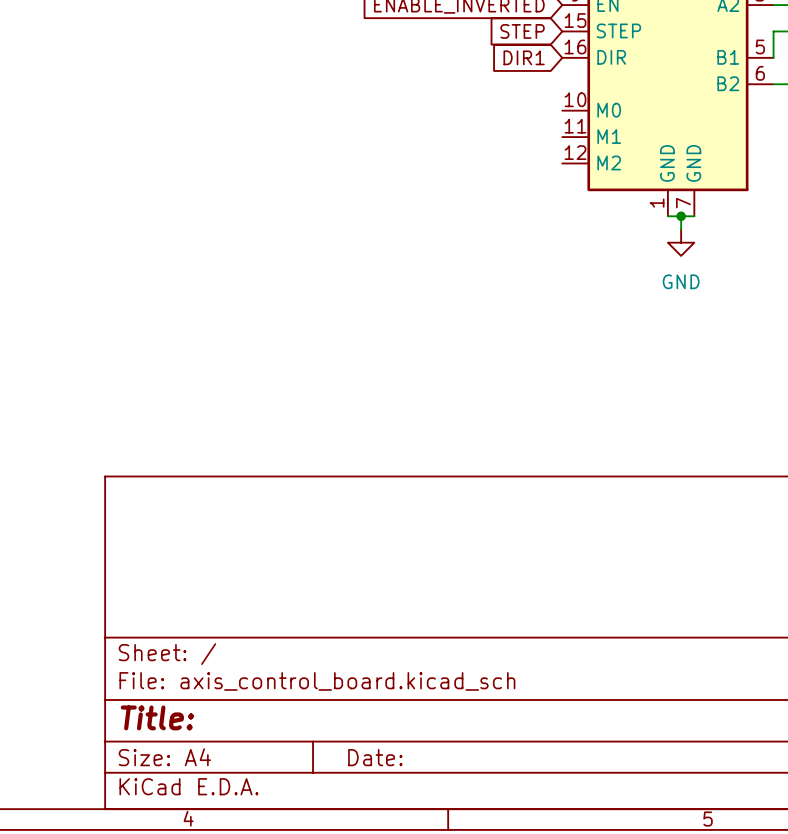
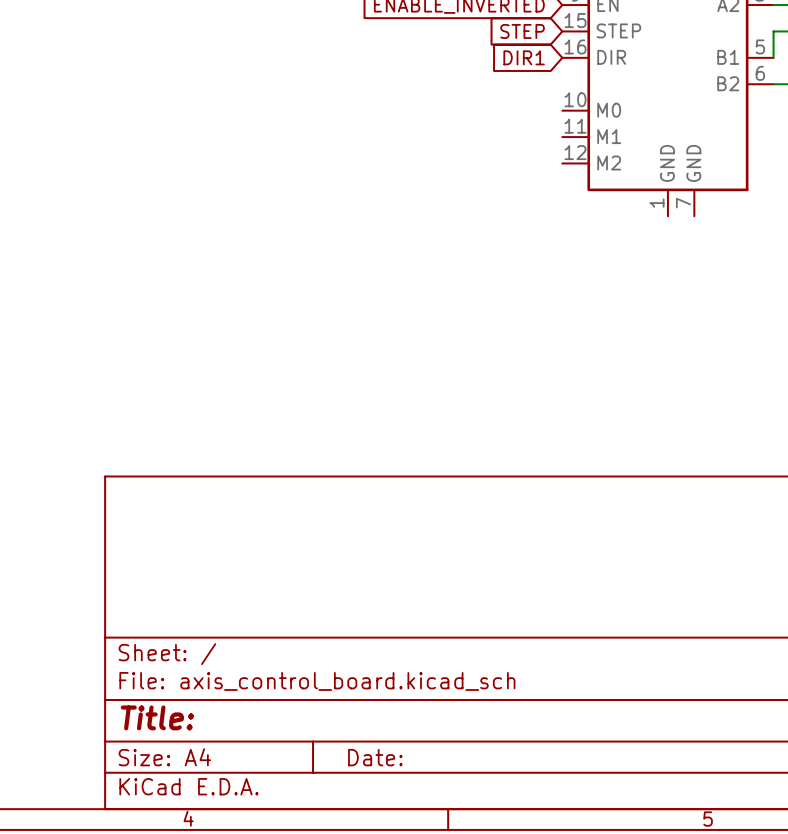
wire: (667, 216) (694, 216) -> none
wire: (681, 216) (681, 229) -> none
junction: (681, 216) -> none
power symbol: GND (681, 242) -> none

